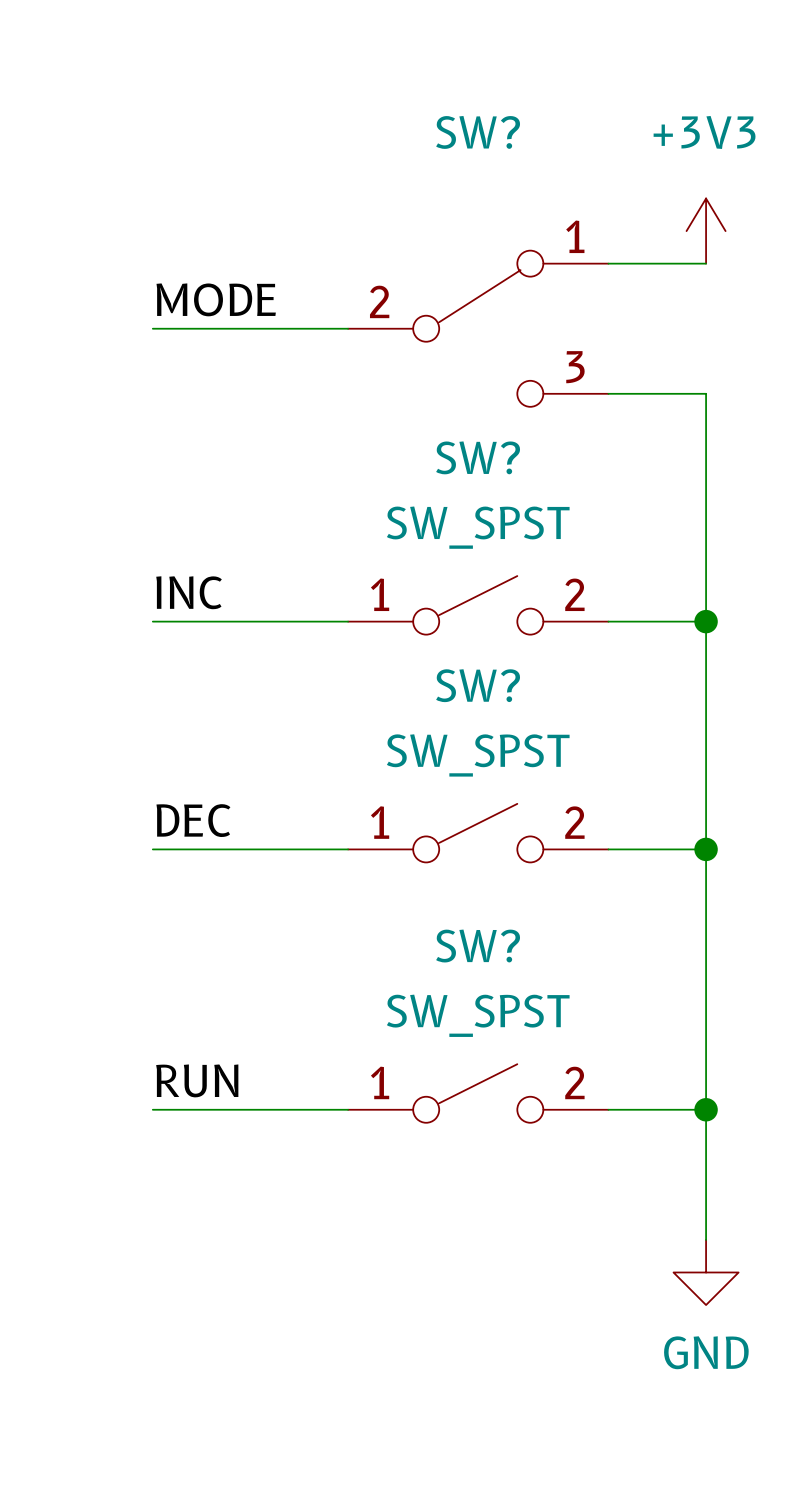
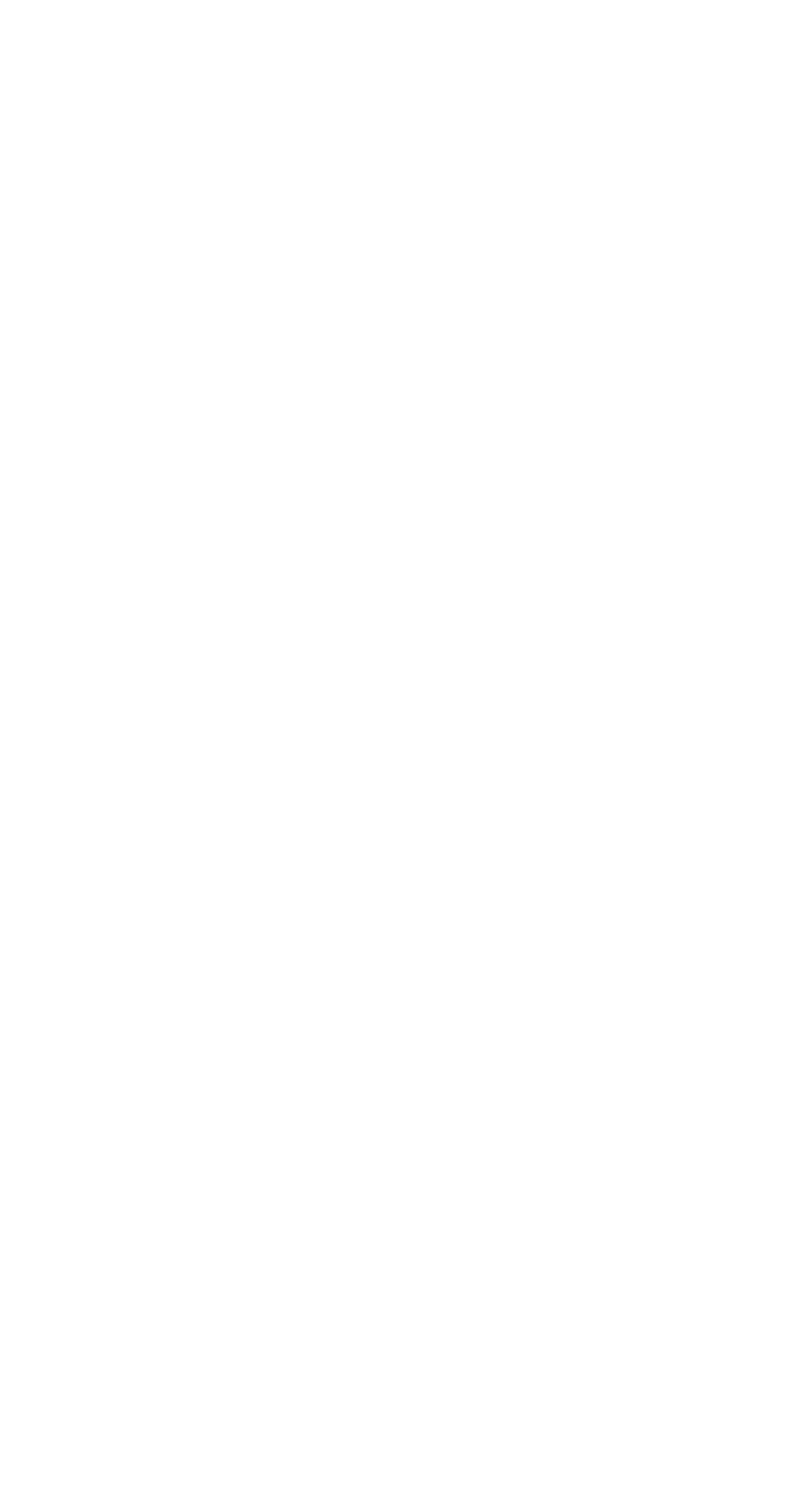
power symbol: +3V3 (706, 231) -> none
wire: (608, 263) (706, 263) -> none
label: MODE (216, 299) -> none
wire: (152, 328) (348, 328) -> none
SW?: (478, 328) -> none
wire: (608, 393) (706, 393) (706, 1239) -> none
label: INC (189, 592) -> none
SW?: SW_SPST (478, 605) -> none
wire: (152, 621) (348, 621) -> none
wire: (608, 621) (706, 621) -> none
junction: (706, 621) -> none
label: DEC (193, 820) -> none
SW?: SW_SPST (478, 833) -> none
wire: (152, 849) (348, 849) -> none
wire: (608, 849) (706, 849) -> none
junction: (706, 849) -> none
label: RUN (197, 1080) -> none
SW?: SW_SPST (478, 1093) -> none
wire: (152, 1109) (348, 1109) -> none
wire: (608, 1109) (706, 1109) -> none
junction: (706, 1109) -> none
power symbol: GND (706, 1272) -> none

